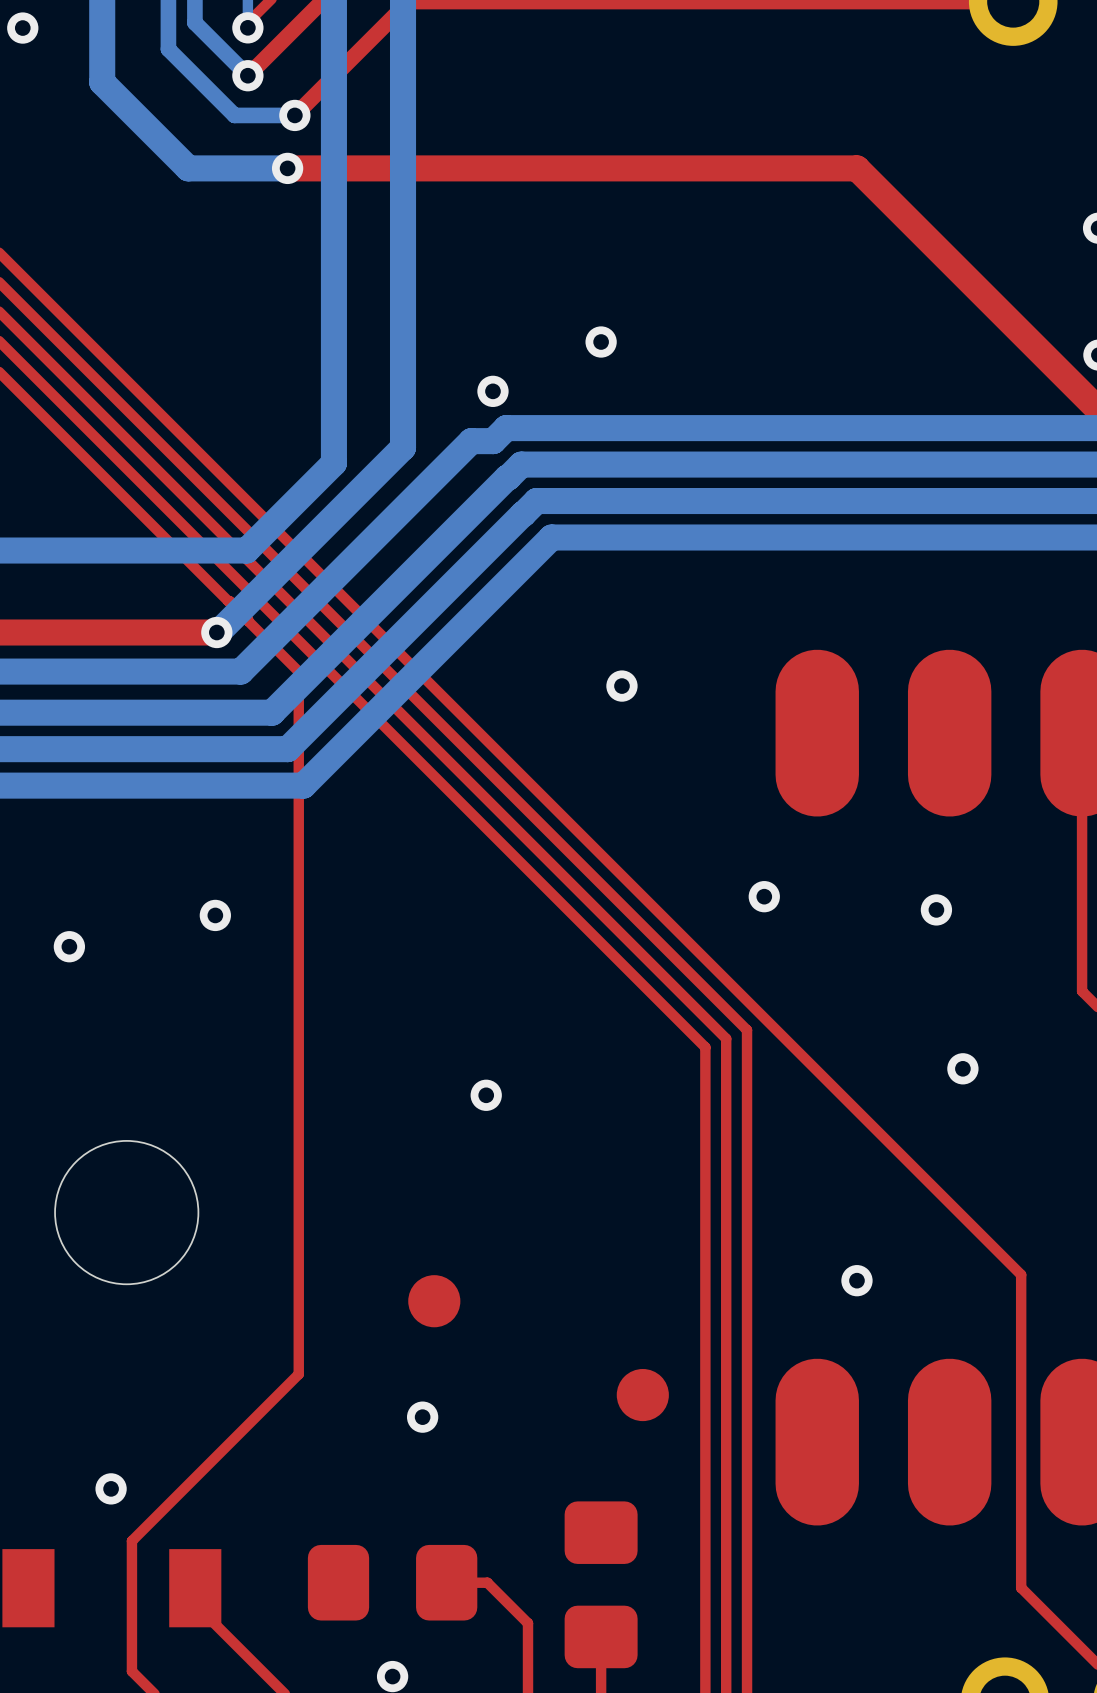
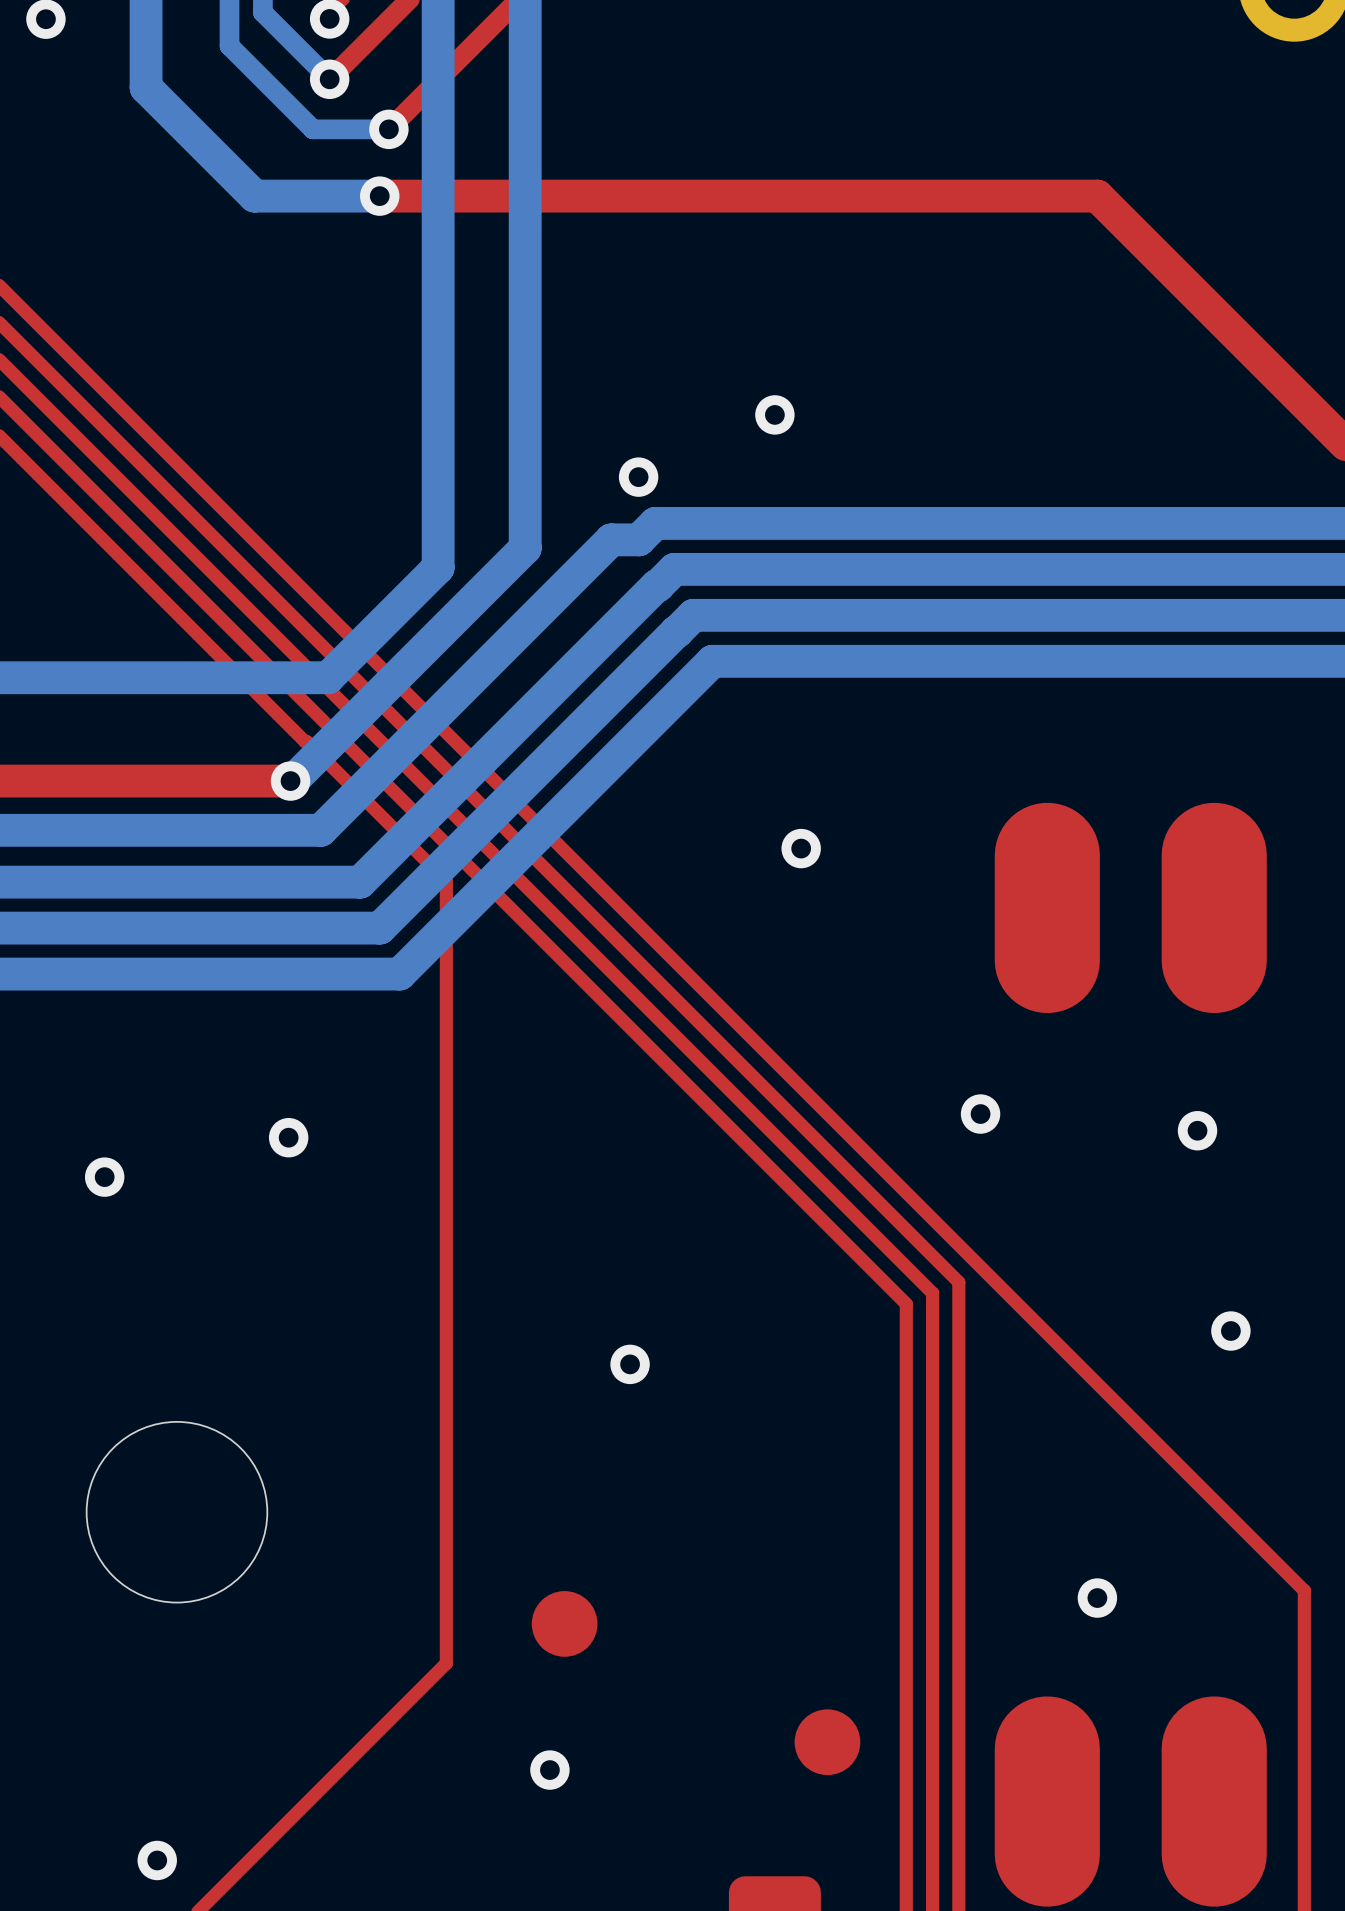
top track: (248, 619) (298, 671) (298, 1374) -> (329, 764) (446, 881) (446, 1663) (393, 1715)

